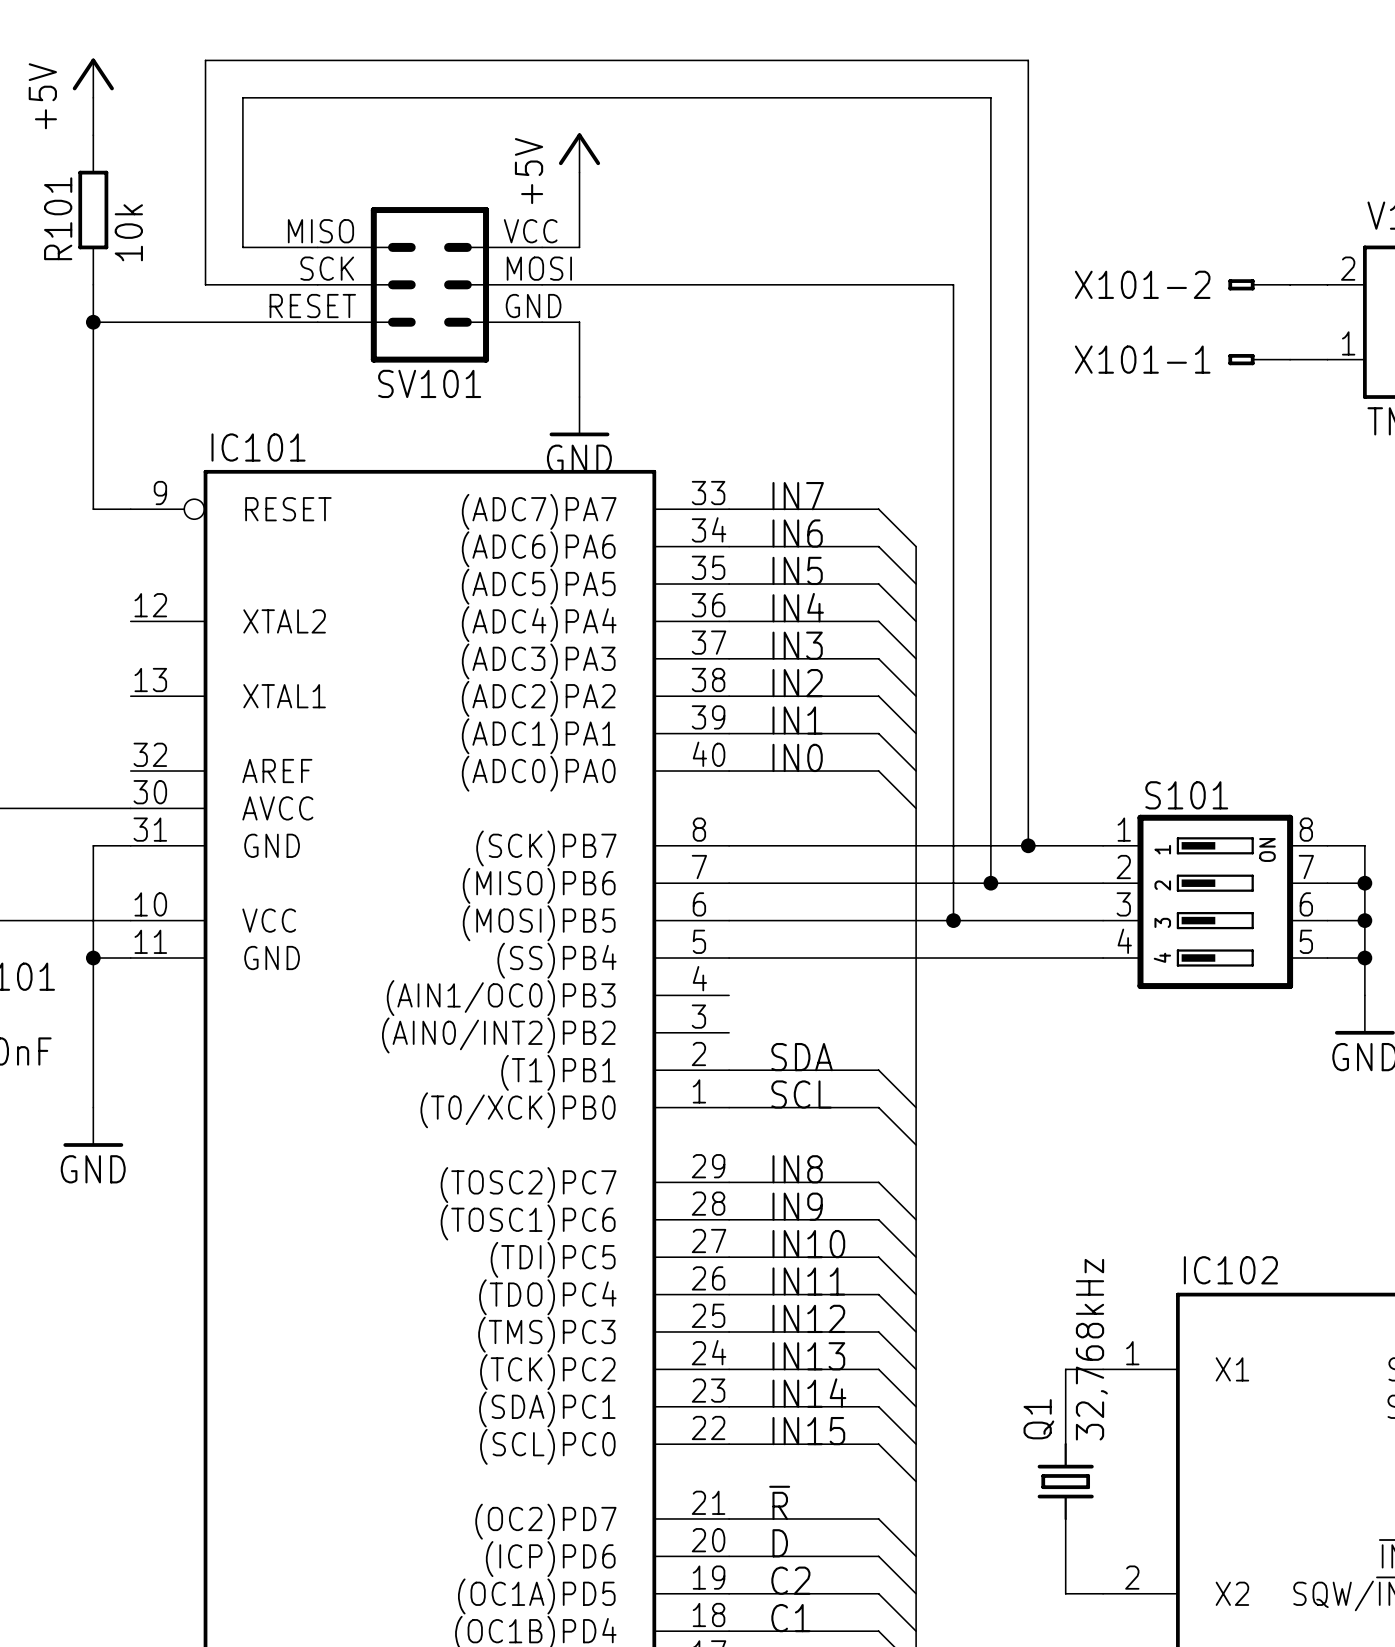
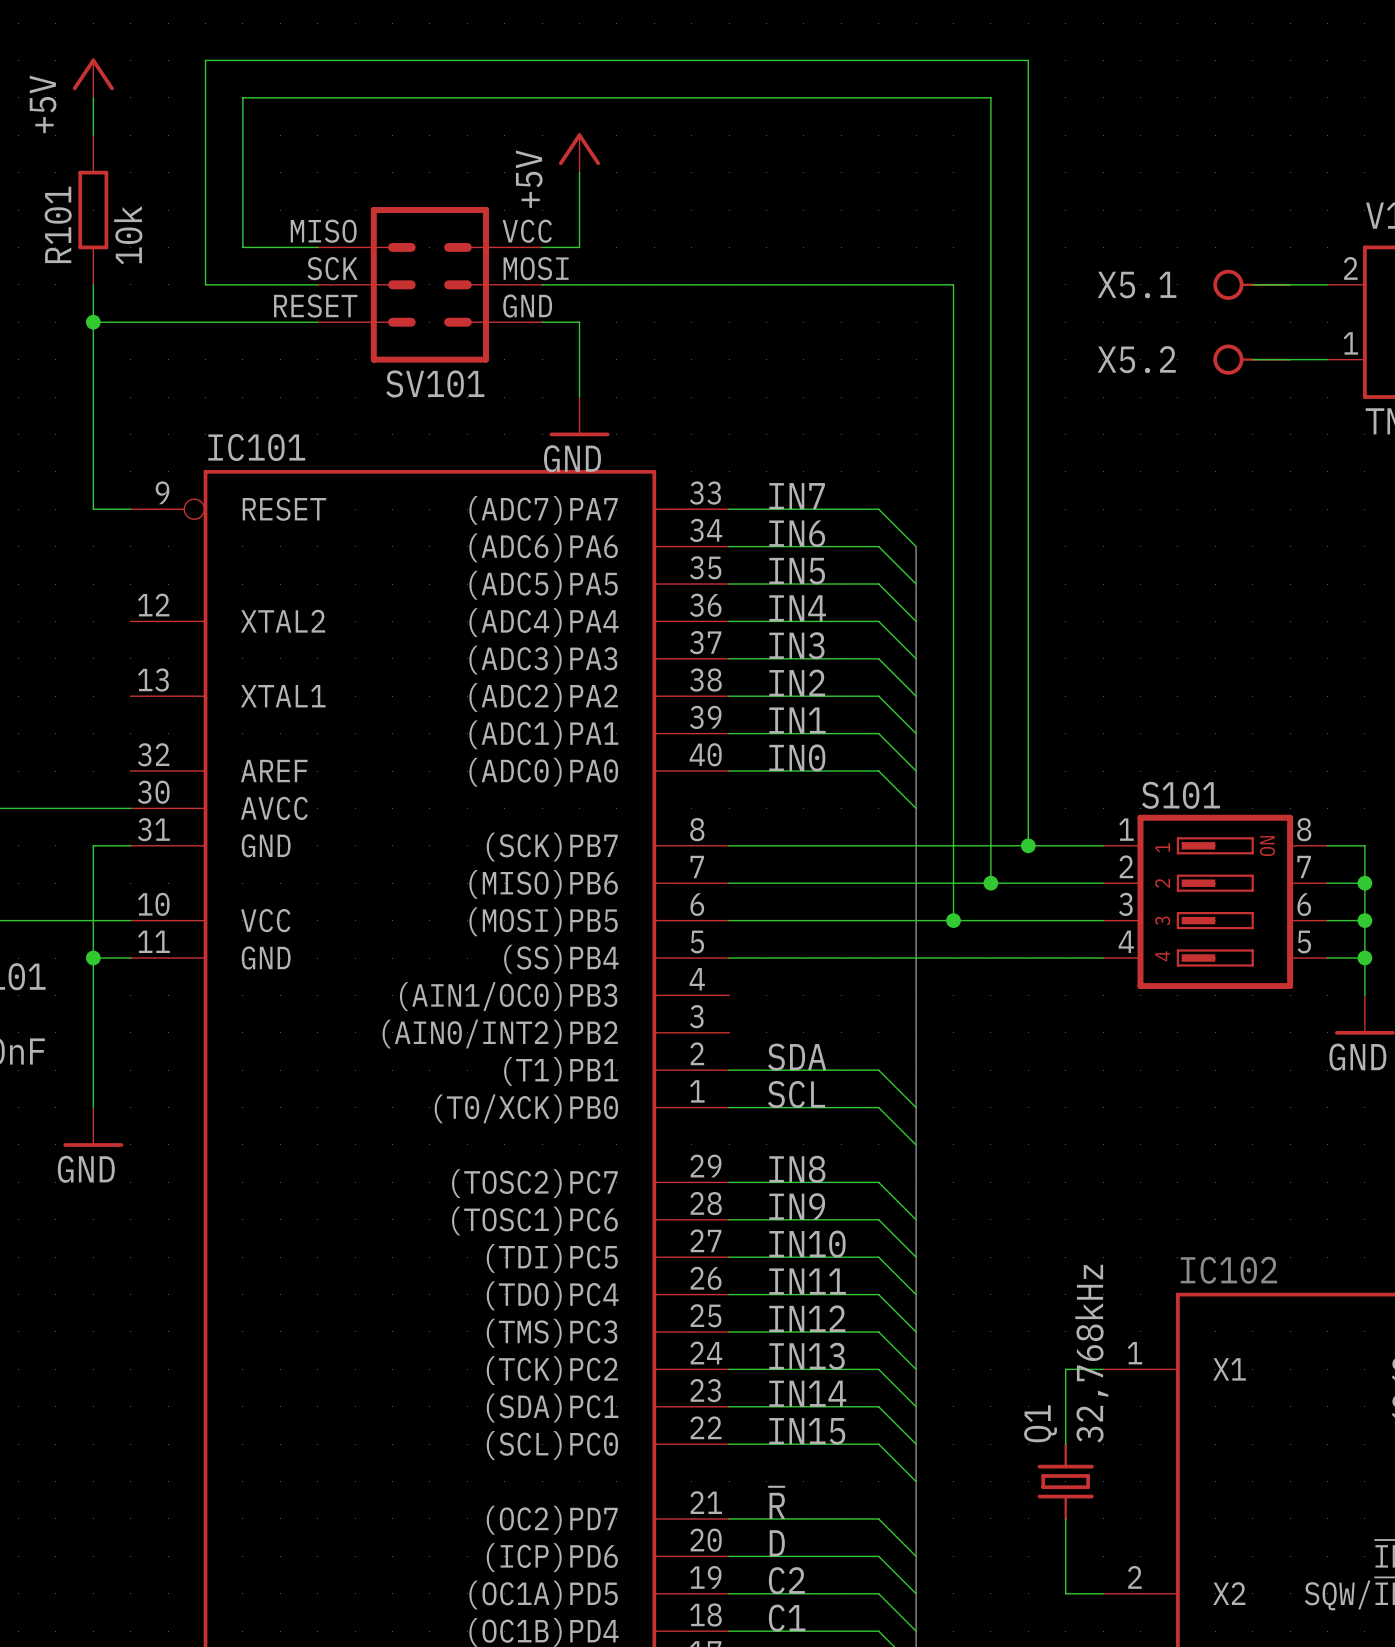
X5.1: none -> (1251, 284)
X101-2: (1277, 284) -> none
X5.2: none -> (1251, 359)
X101-1: (1277, 359) -> none

